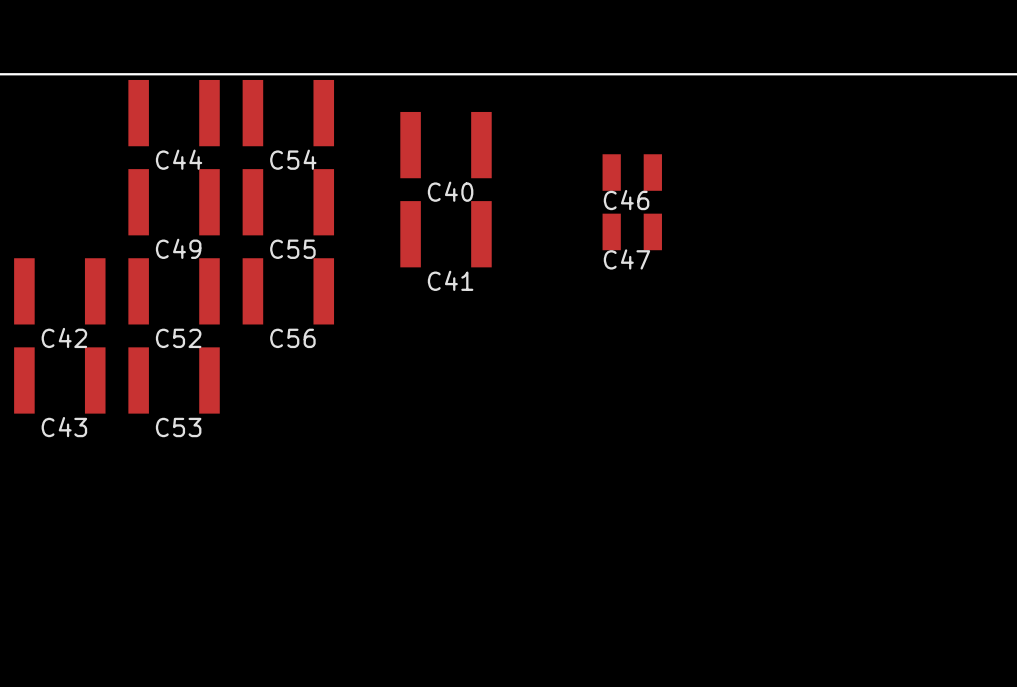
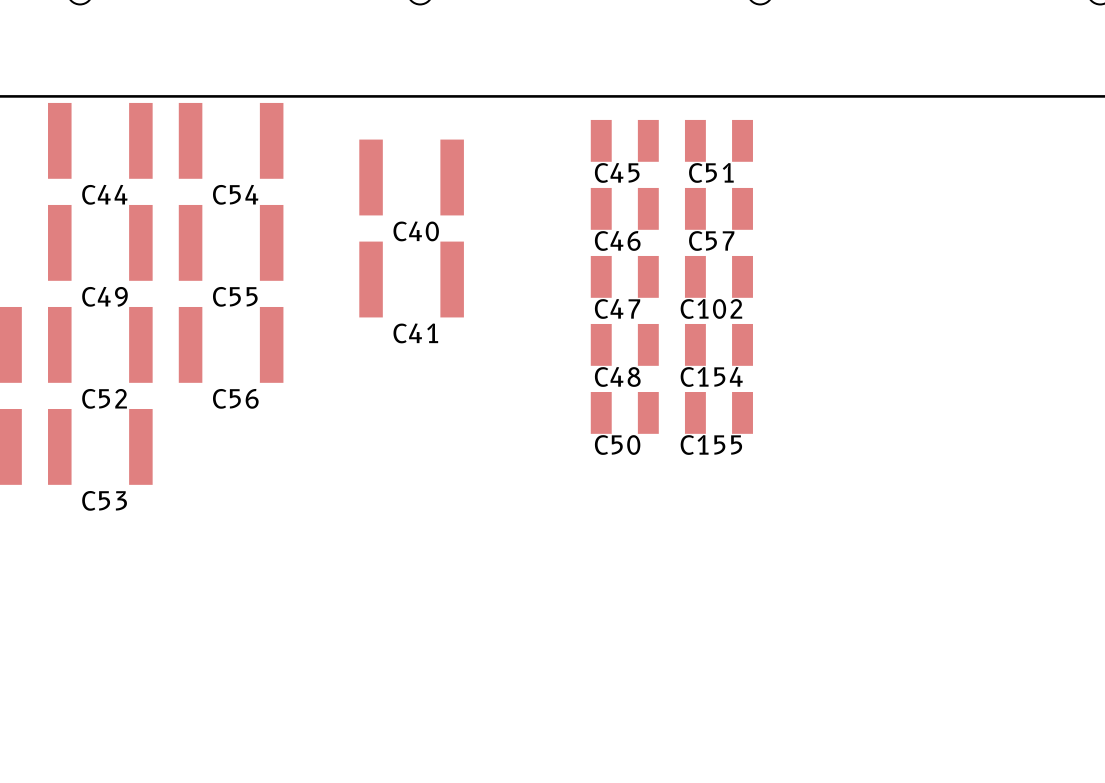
C45: none -> (624, 140)
C51: none -> (718, 140)
C57: none -> (718, 208)
C102: none -> (718, 276)
C48: none -> (624, 344)
C154: none -> (718, 344)
C50: none -> (624, 412)
C155: none -> (718, 412)

